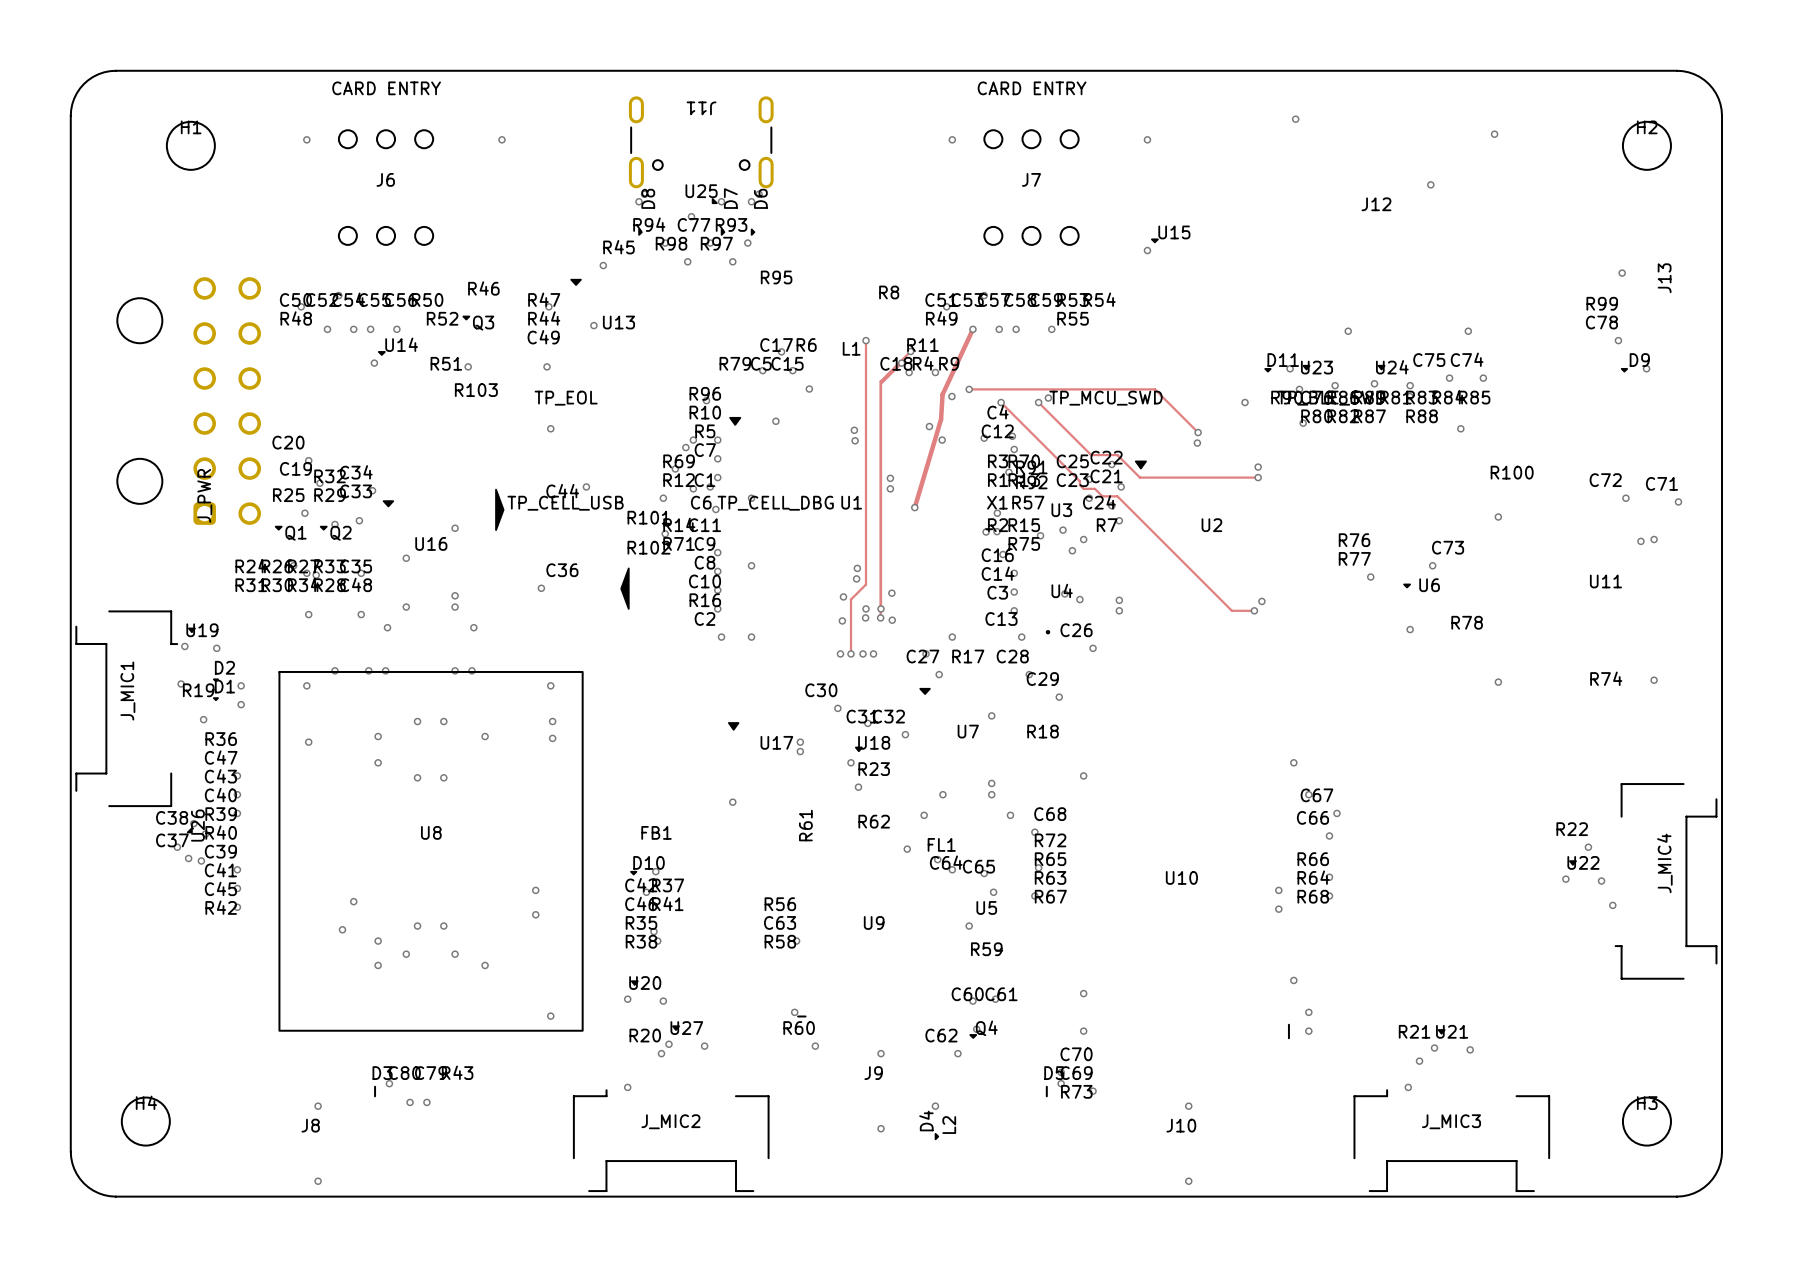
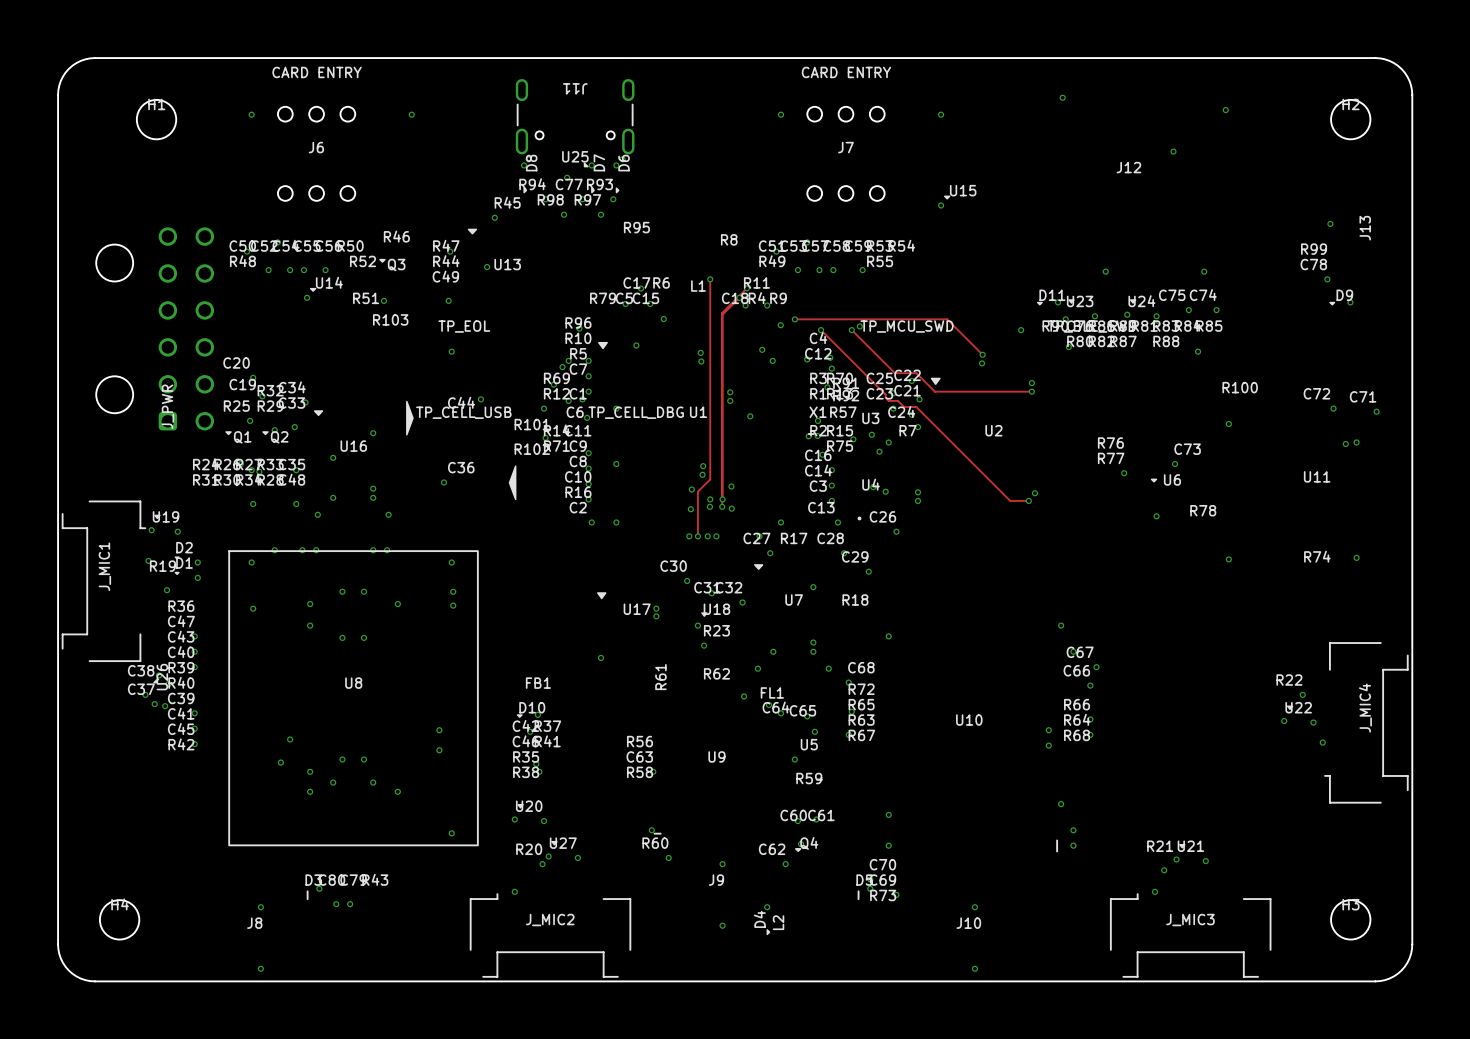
track: (972, 329) (942, 394) (941, 419) (914, 507) -> none

